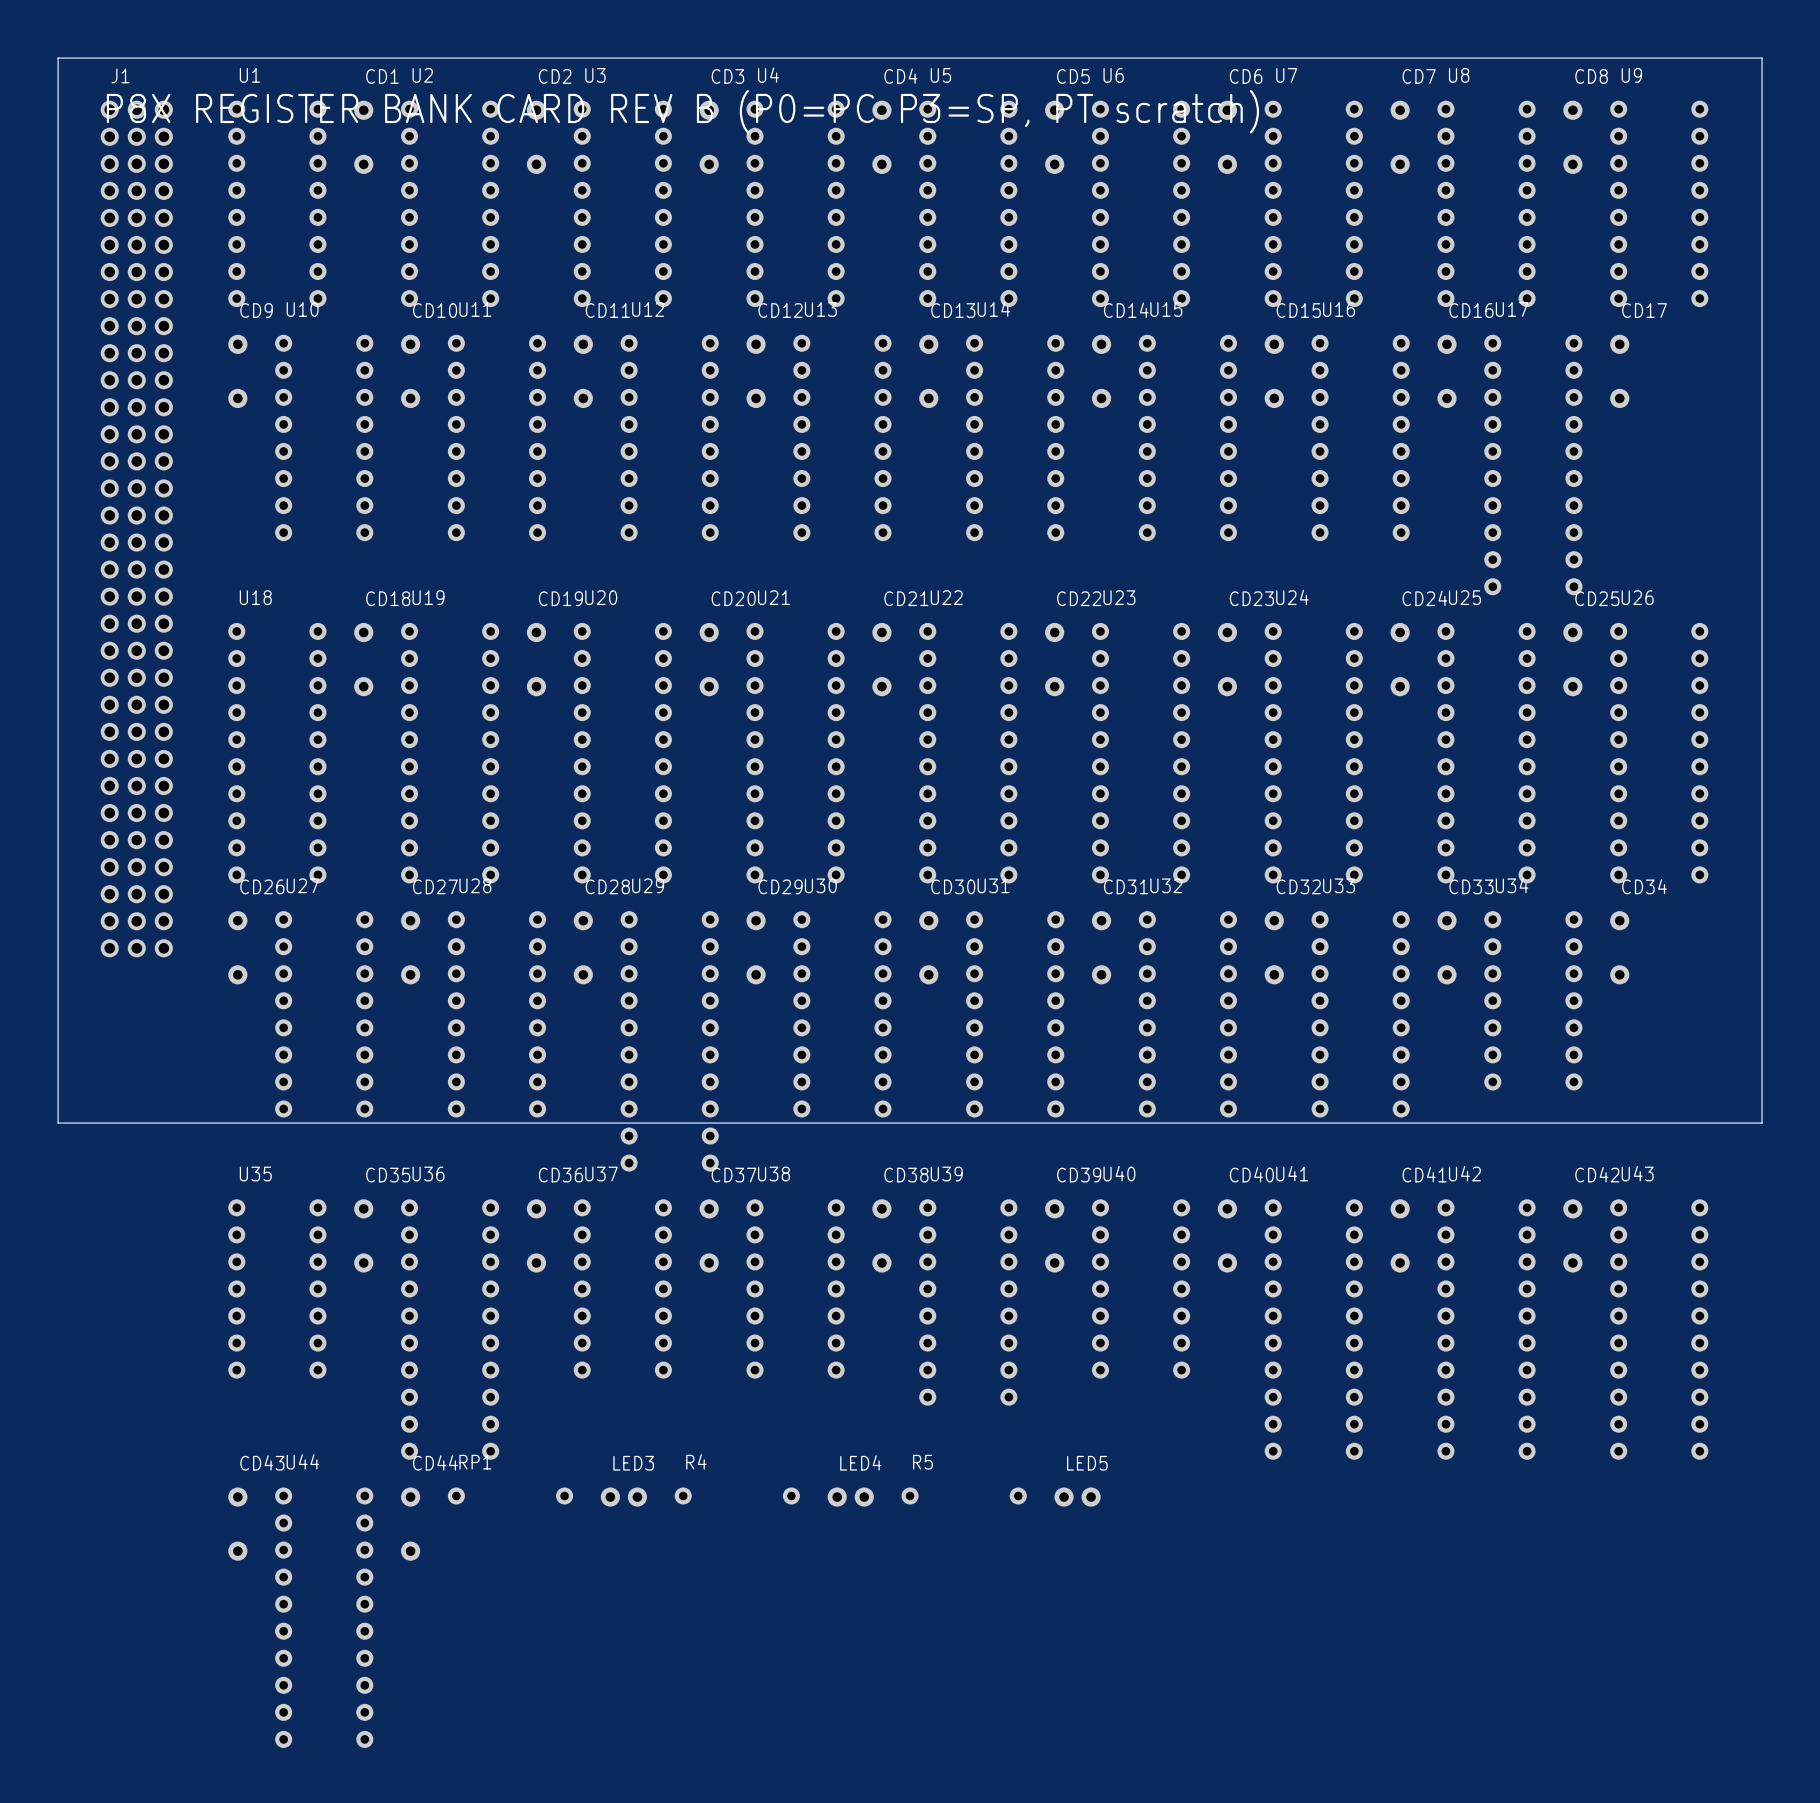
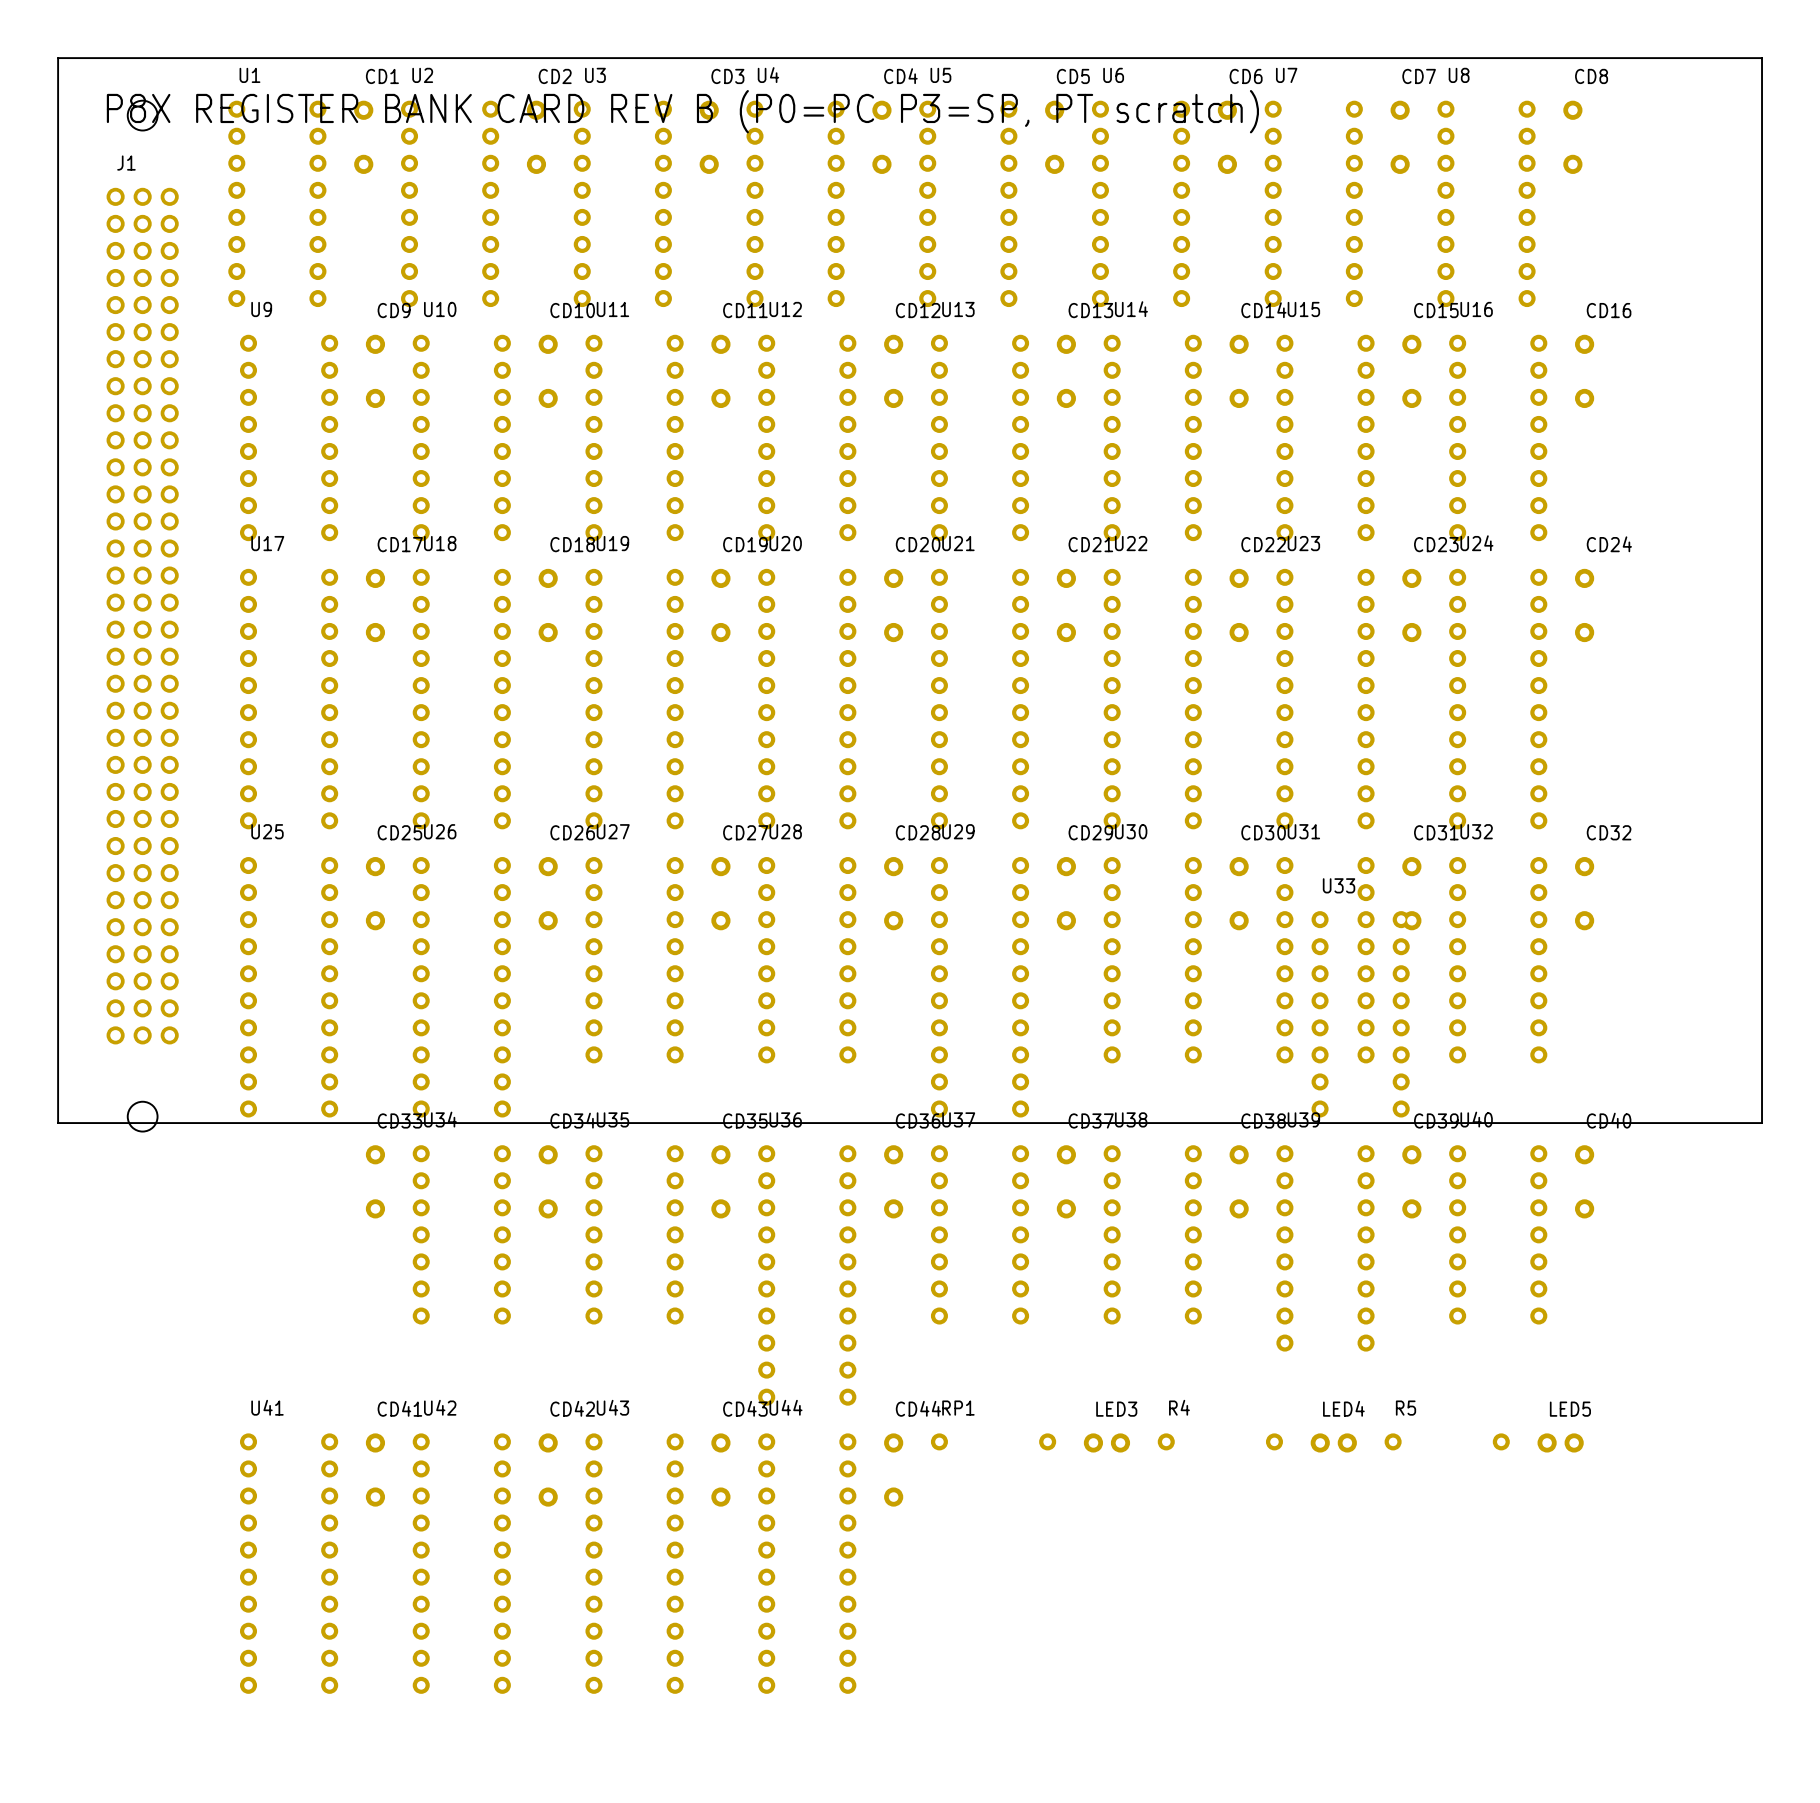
J1 footprint: [100, 100, 173, 958] -> [106, 100, 179, 1132]
U9 position: (1659, 203) -> (289, 437)
CD9 position: (237, 371) -> (375, 371)
CD10 position: (410, 371) -> (548, 371)
CD11 position: (583, 371) -> (720, 371)
CD12 position: (756, 371) -> (893, 371)
CD13 position: (928, 371) -> (1066, 371)
CD14 position: (1101, 371) -> (1239, 371)
CD15 position: (1274, 371) -> (1411, 371)
CD16 position: (1447, 371) -> (1584, 371)
CD17 position: (1619, 371) -> (375, 605)
U10 position: (324, 437) -> (461, 437)
U11 position: (496, 437) -> (634, 437)
U12 position: (669, 437) -> (807, 437)
U13 position: (842, 437) -> (980, 437)
U14 position: (1015, 437) -> (1152, 437)
U15 position: (1187, 437) -> (1325, 437)
U16 position: (1360, 437) -> (1498, 437)
U17 position: (1533, 465) -> (289, 699)
CD18 position: (363, 659) -> (548, 605)
CD19 position: (536, 659) -> (720, 605)
CD20 position: (709, 659) -> (893, 605)
CD21 position: (881, 659) -> (1066, 605)
CD22 position: (1054, 659) -> (1239, 605)
CD23 position: (1227, 659) -> (1411, 605)
CD24 position: (1400, 659) -> (1584, 605)
CD25 position: (1572, 659) -> (375, 893)
U18 position: (277, 753) -> (461, 699)
U19 position: (450, 753) -> (634, 699)
U20 position: (622, 753) -> (807, 699)
U21 position: (795, 753) -> (980, 699)
U22 position: (968, 753) -> (1152, 699)
U23 position: (1141, 753) -> (1325, 699)
U24 position: (1313, 753) -> (1498, 699)
U25 position: (1486, 753) -> (289, 987)
U26 position: (1659, 753) -> (461, 987)
CD26 position: (237, 947) -> (548, 893)
CD27 position: (410, 947) -> (720, 893)
CD28 position: (583, 947) -> (893, 893)
CD29 position: (756, 947) -> (1066, 893)
CD30 position: (928, 947) -> (1239, 893)
CD31 position: (1101, 947) -> (1411, 893)
CD32 position: (1274, 947) -> (1584, 893)
CD33 position: (1447, 947) -> (375, 1181)
CD34 position: (1619, 947) -> (548, 1181)
U34 position: (1533, 1000) -> (461, 1234)
U27 position: (324, 1014) -> (634, 960)
U28 position: (496, 1014) -> (807, 960)
U30 position: (842, 1014) -> (1152, 960)
U31 position: (1015, 1014) -> (1325, 960)
U32 position: (1187, 1014) -> (1498, 960)
U29 position: (669, 1041) -> (980, 987)
CD35 position: (363, 1235) -> (720, 1181)
CD36 position: (536, 1235) -> (893, 1181)
CD37 position: (709, 1235) -> (1066, 1181)
CD38 position: (881, 1235) -> (1239, 1181)
CD39 position: (1054, 1235) -> (1411, 1181)
CD40 position: (1227, 1235) -> (1584, 1181)
CD41 position: (1400, 1235) -> (375, 1470)
CD42 position: (1572, 1235) -> (548, 1470)
U35 position: (277, 1288) -> (634, 1234)
U37 position: (622, 1288) -> (980, 1234)
U38 position: (795, 1288) -> (1152, 1234)
U40 position: (1141, 1288) -> (1498, 1234)
U39 position: (968, 1302) -> (1325, 1248)
U36 position: (450, 1329) -> (807, 1275)
U41 position: (1313, 1329) -> (289, 1563)
U42 position: (1486, 1329) -> (461, 1563)
U43 position: (1659, 1329) -> (634, 1563)
RP1 position: (510, 1495) -> (993, 1441)
R4 position: (737, 1495) -> (1220, 1441)
R5 position: (964, 1495) -> (1447, 1441)
LED3 position: (623, 1497) -> (1106, 1442)
LED4 position: (850, 1497) -> (1333, 1442)
LED5 position: (1077, 1497) -> (1560, 1442)
CD43 position: (237, 1524) -> (720, 1470)
CD44 position: (410, 1524) -> (893, 1470)
U44 position: (324, 1617) -> (807, 1563)

